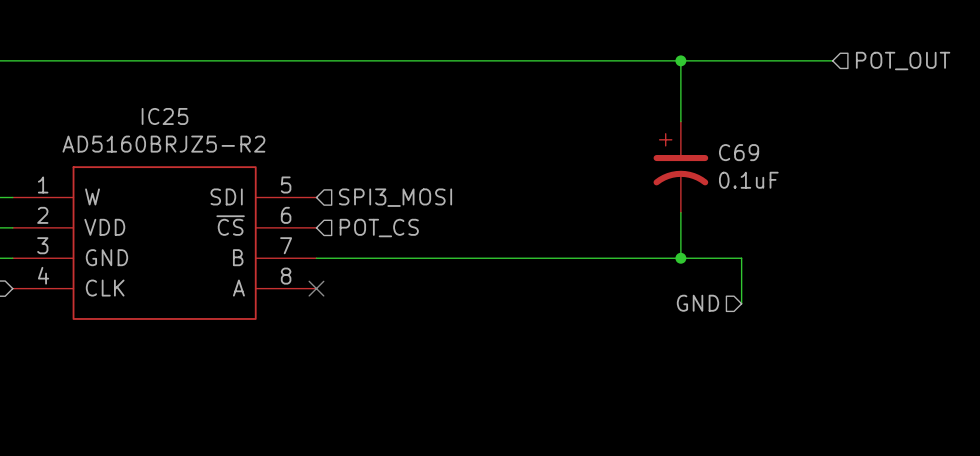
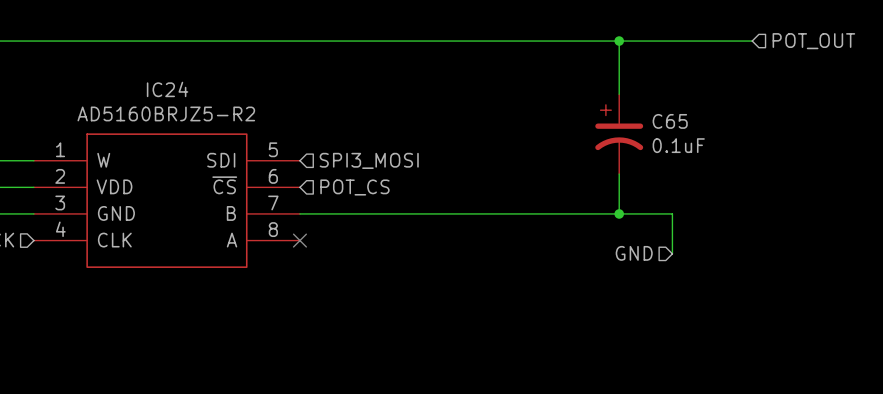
IC25 name: IC25 (164, 116) -> IC24 (167, 89)
C69 name: C69 (739, 152) -> C65 (670, 121)

